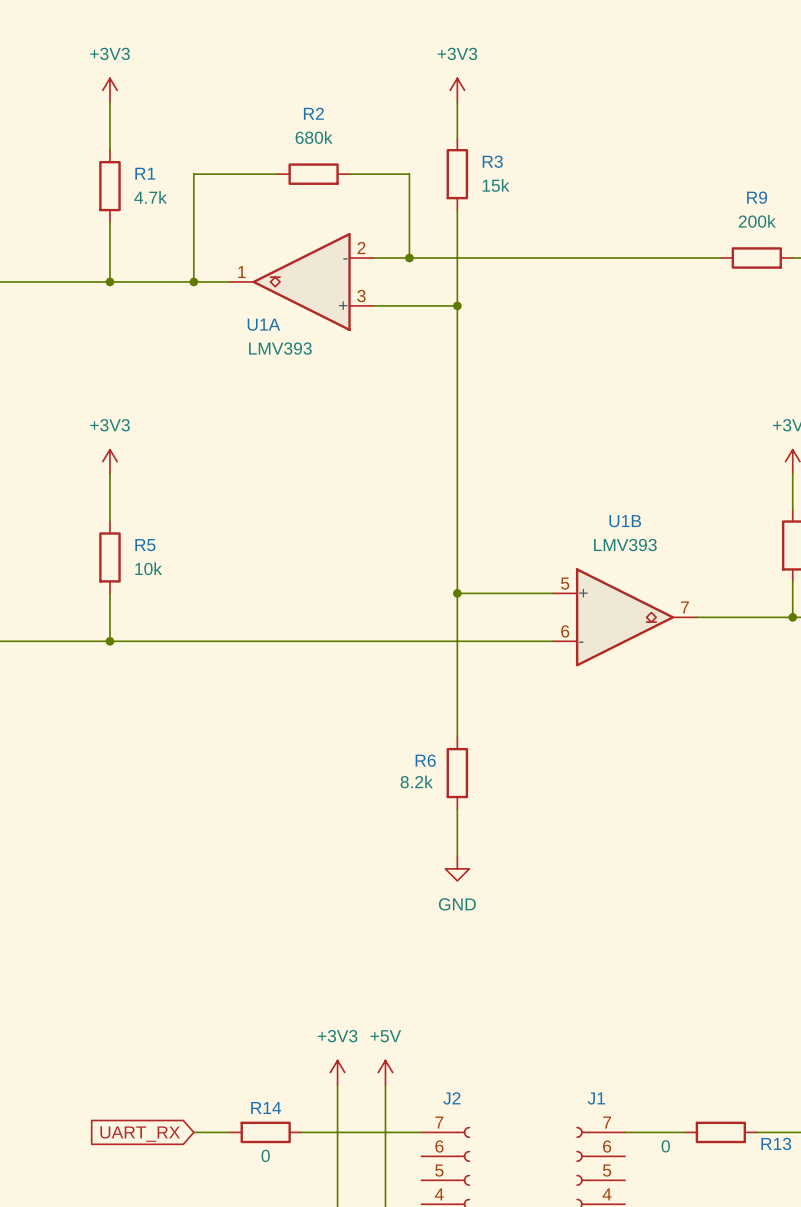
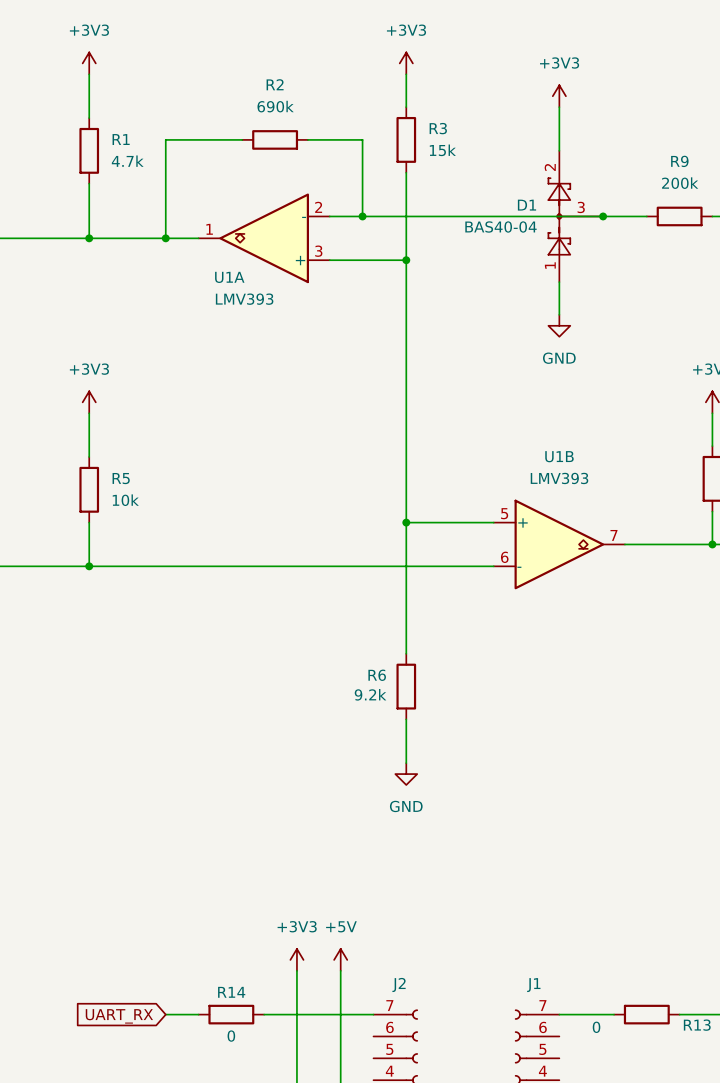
power symbol: none -> +3V3 (559, 96)
R2 value: 680k (314, 137) -> 690k (275, 106)
wire: none -> (559, 107) (559, 150)
D1: none -> BAS40-04 (575, 216)
junction: none -> (603, 216)
wire: none -> (559, 282) (559, 314)
power symbol: none -> GND (559, 325)
R6 value: 8.2k (416, 781) -> 9.2k (370, 694)

